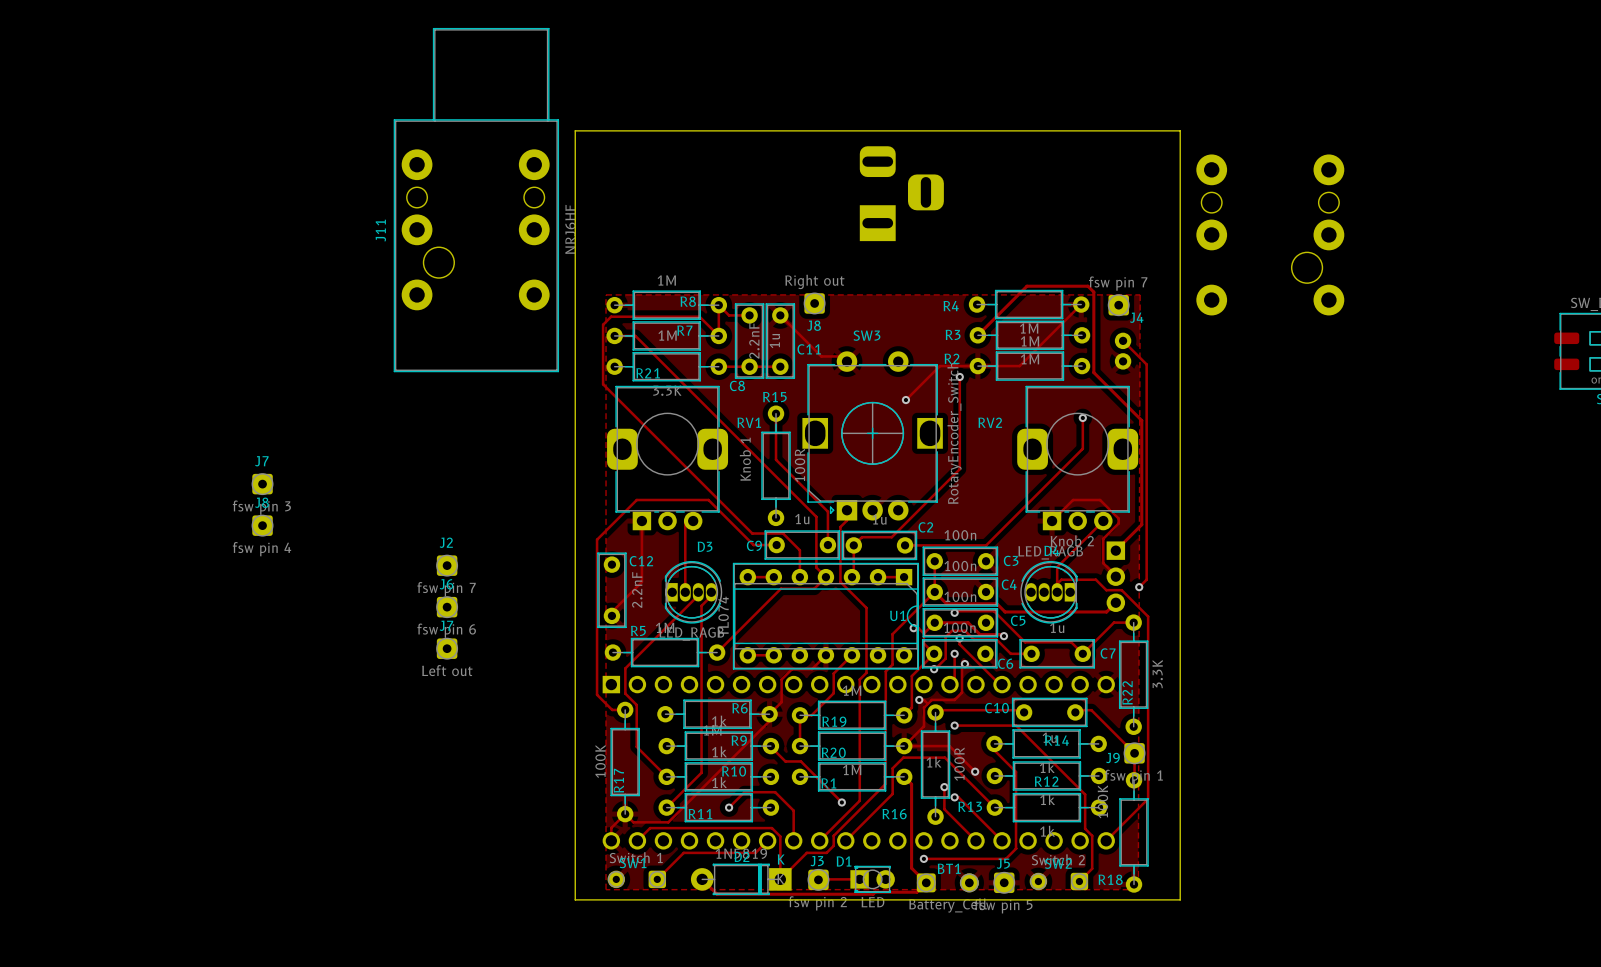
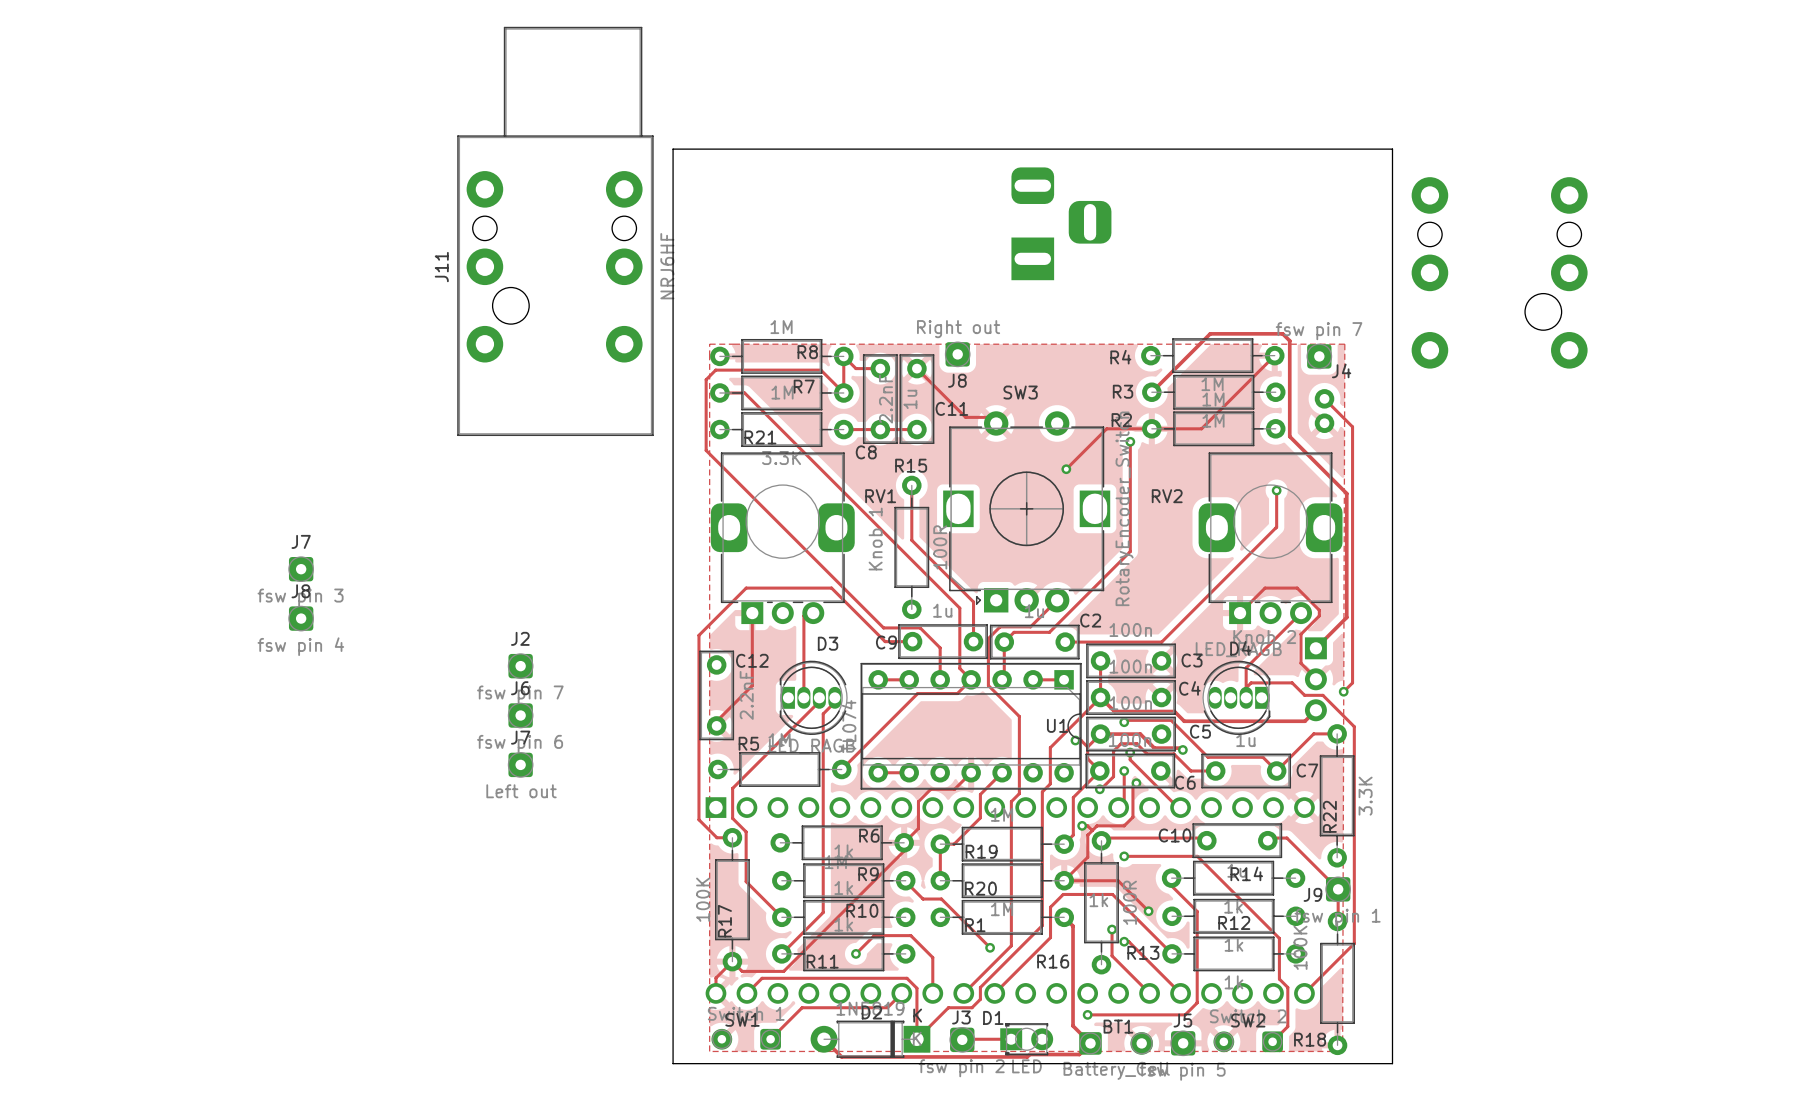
track: (846, 510) (846, 520) (840, 527) (840, 542) -> (1057, 600) (1030, 626) (1000, 626) (988, 638)

